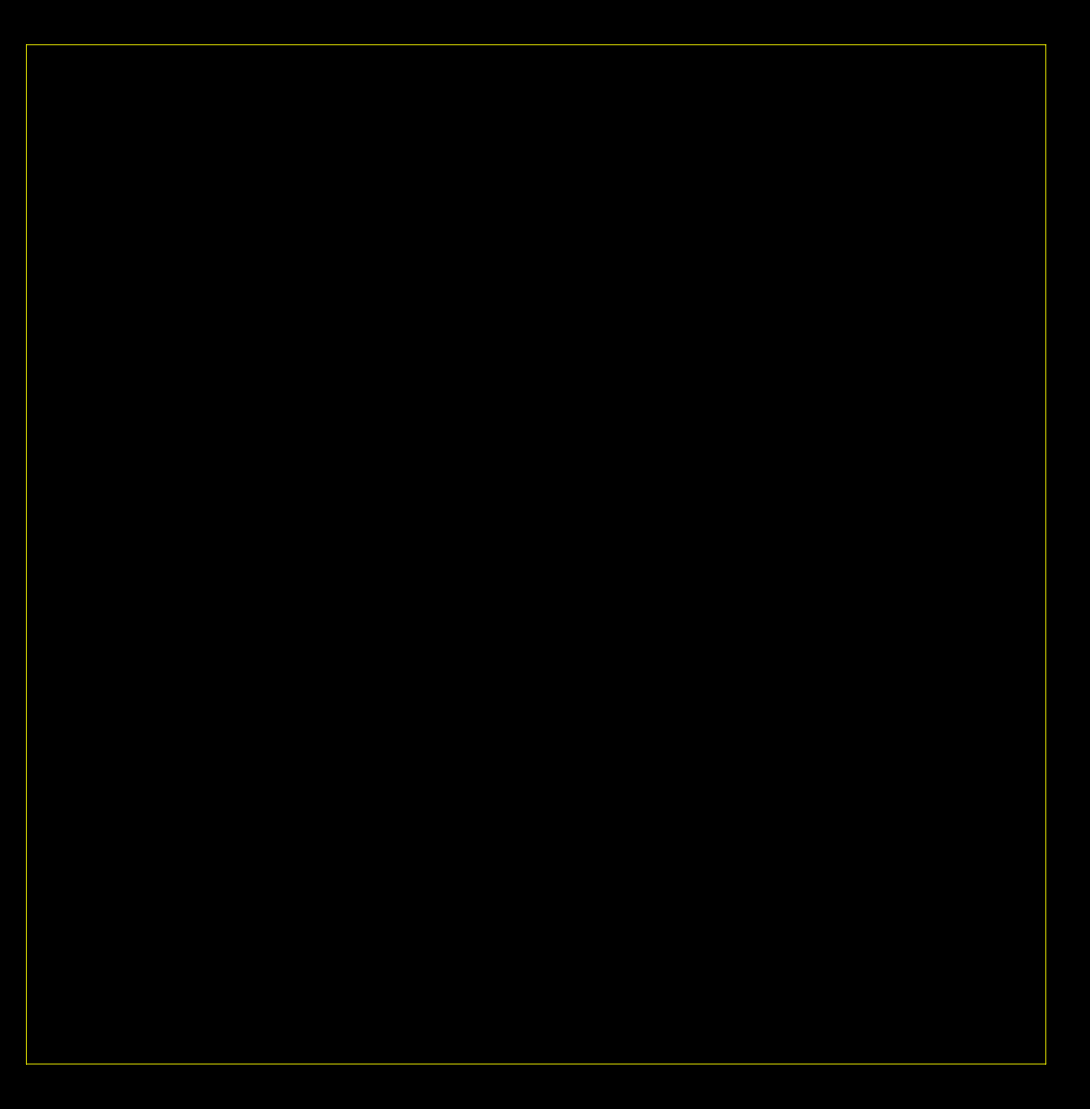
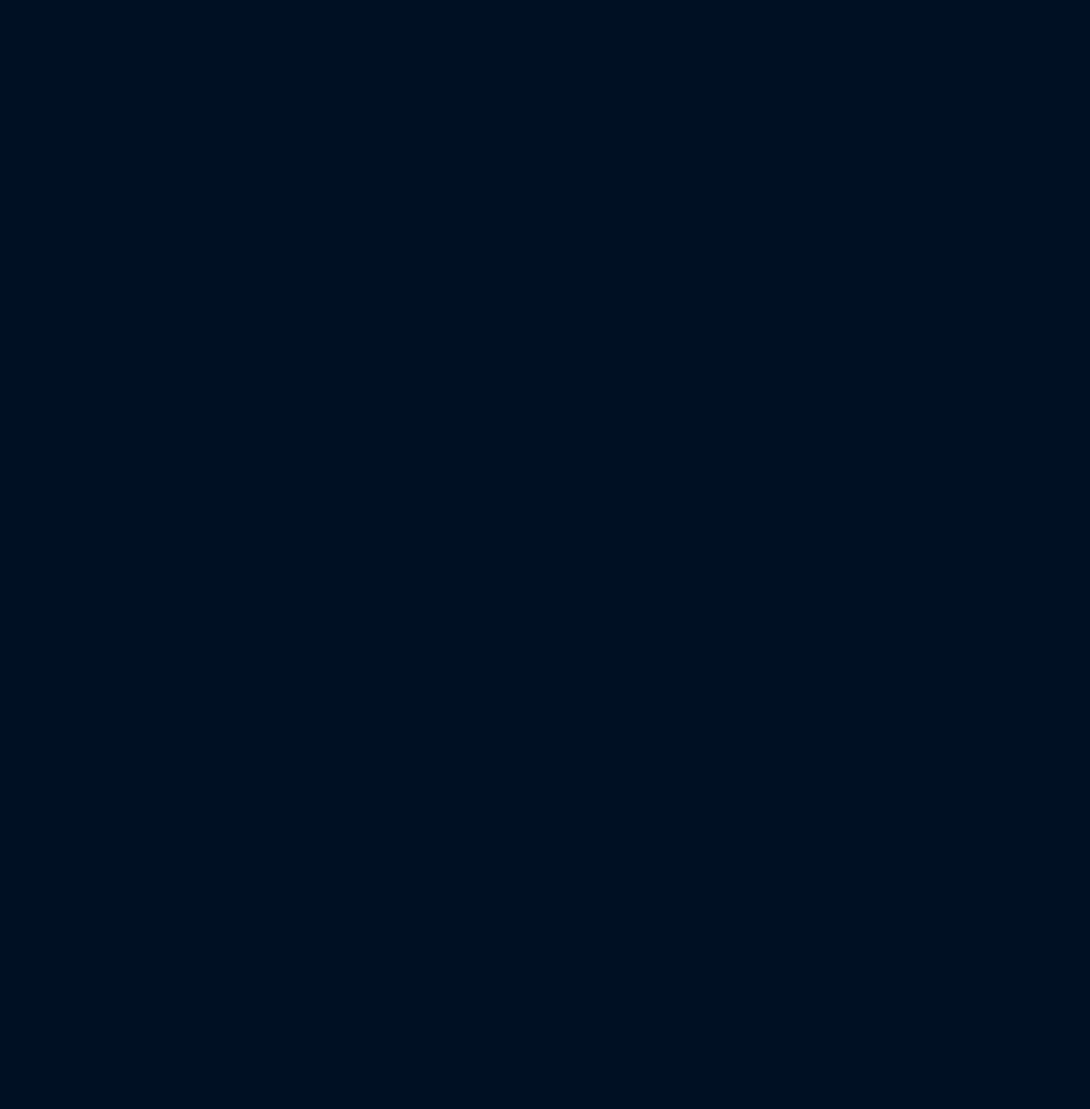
board edge: (1045, 44) (26, 44) (26, 1064) (1045, 1064) (1045, 44) -> none

